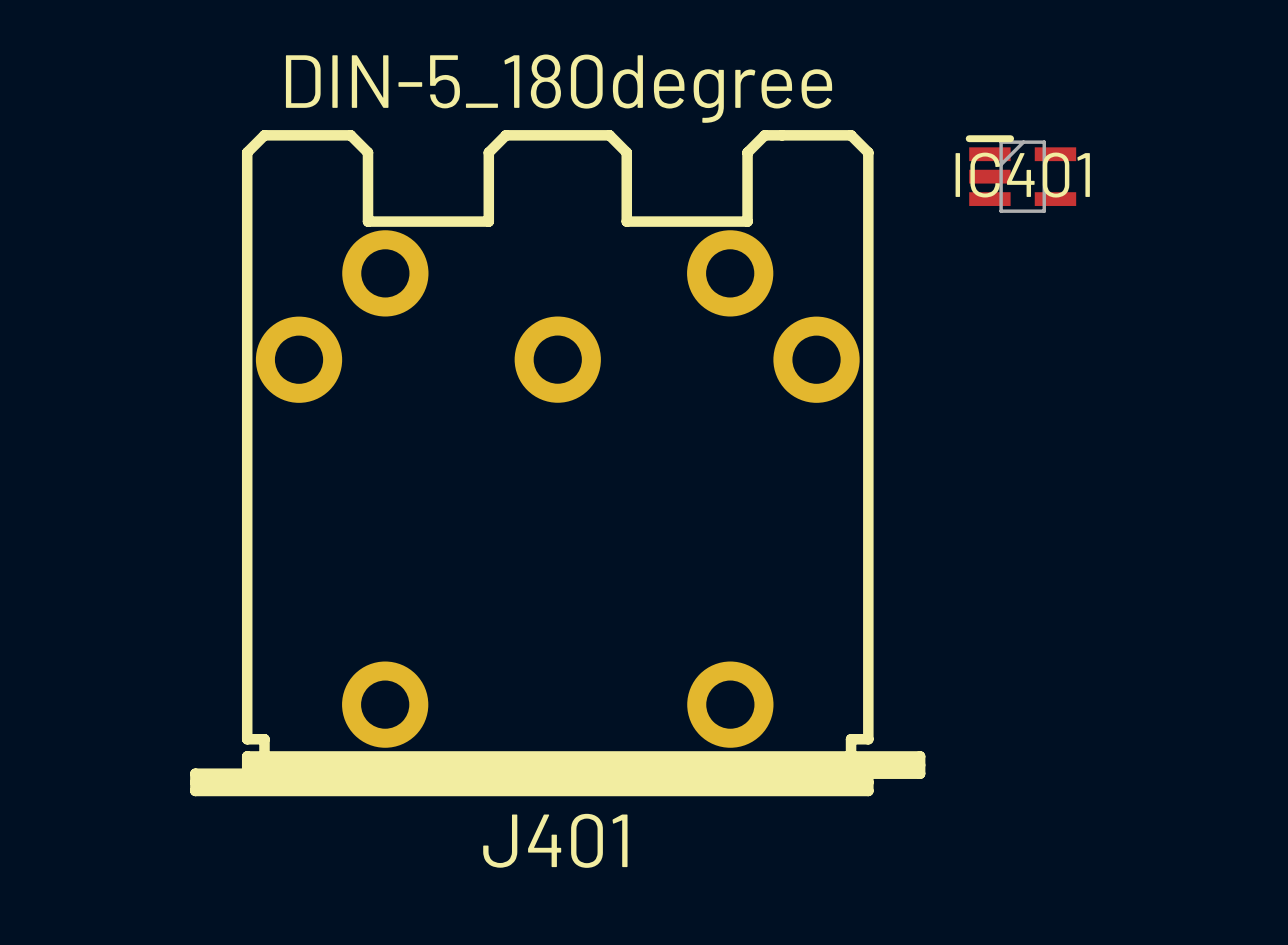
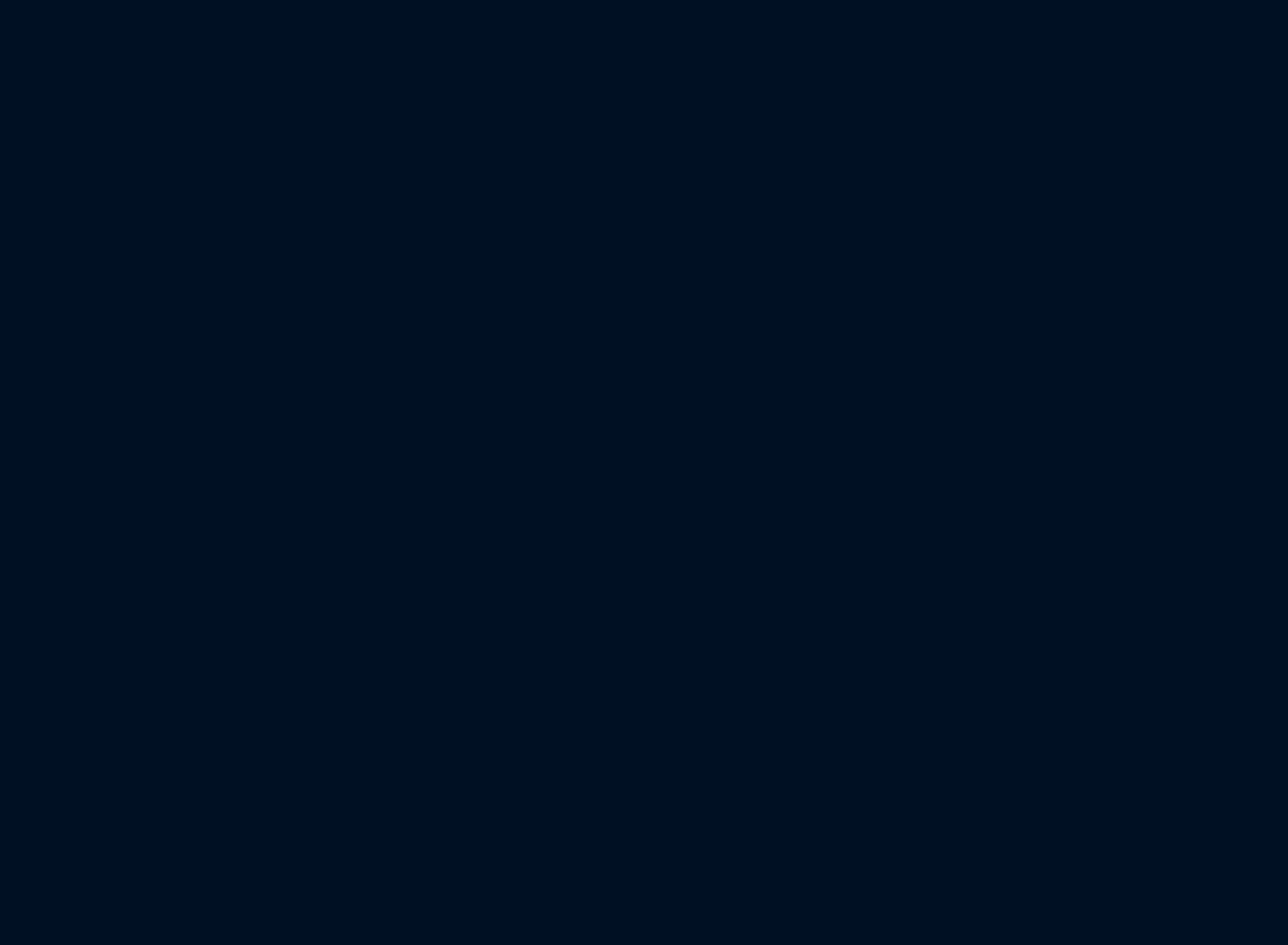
IC401: (1020, 174) -> none
J401: DIN-5_180degree (557, 463) -> none

